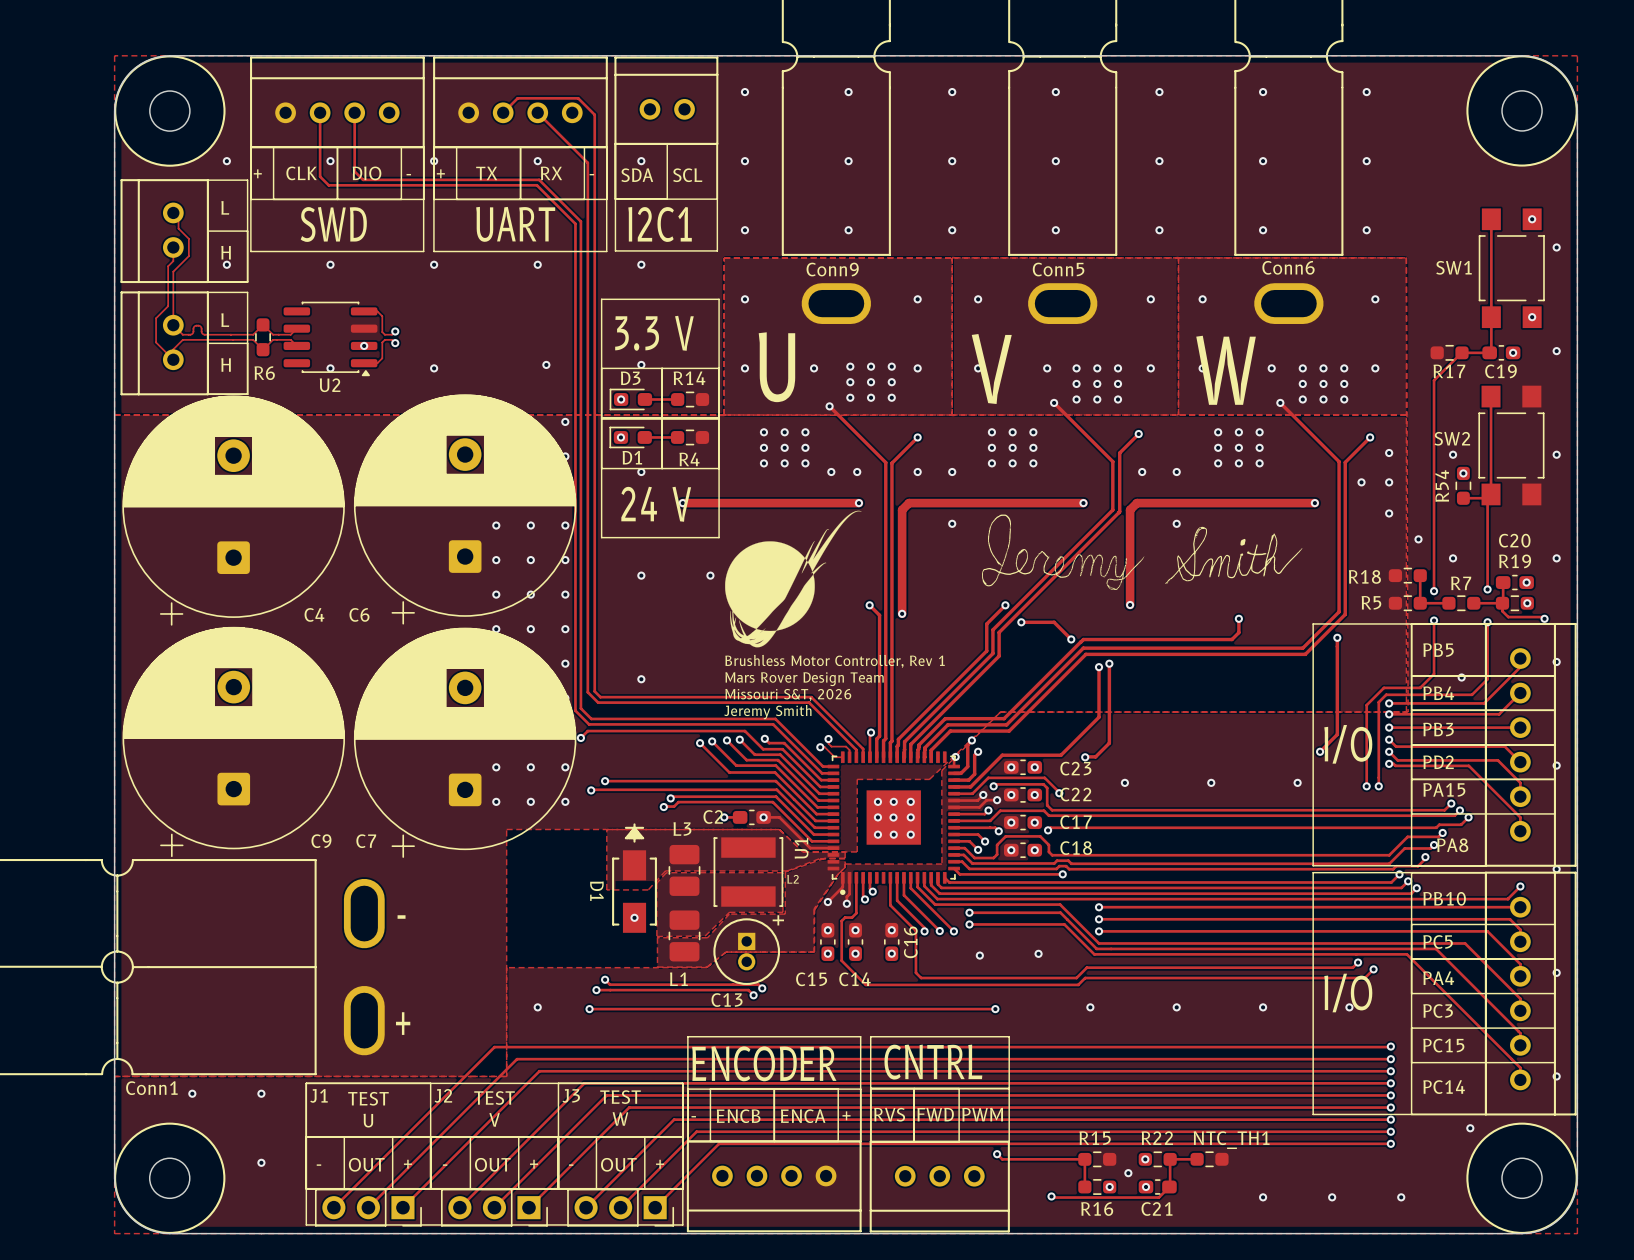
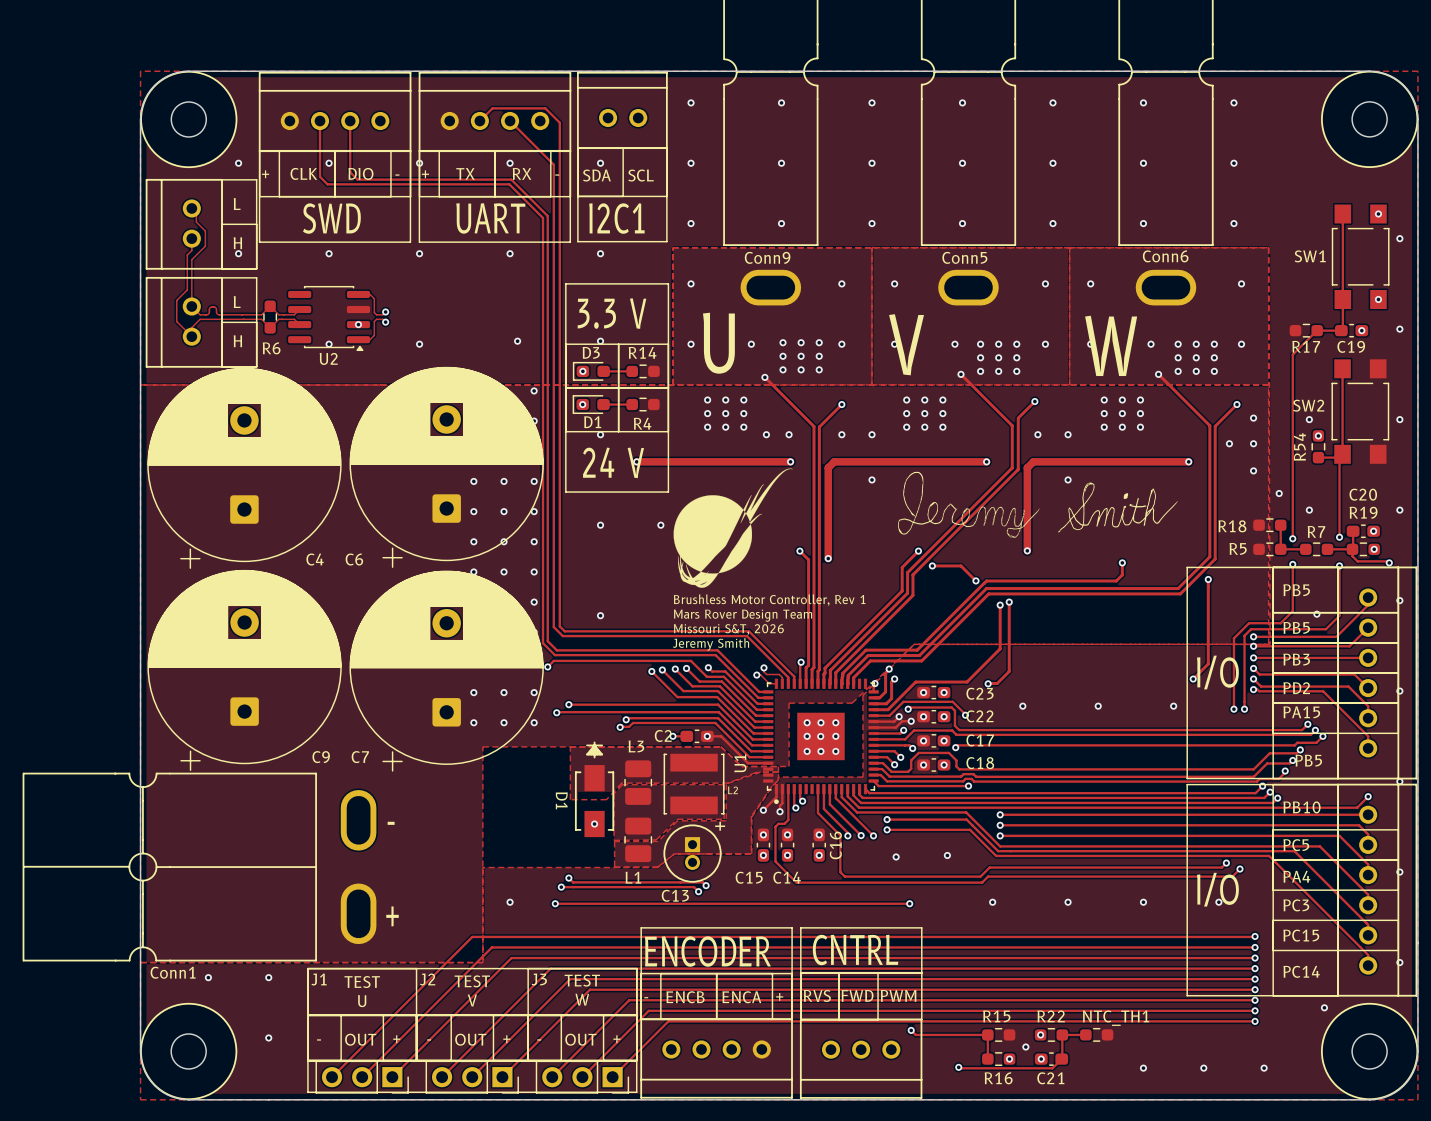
text: PB4 (1438, 693) -> PB5 (1296, 627)
text: PA8 (1452, 845) -> PB5 (1308, 760)

